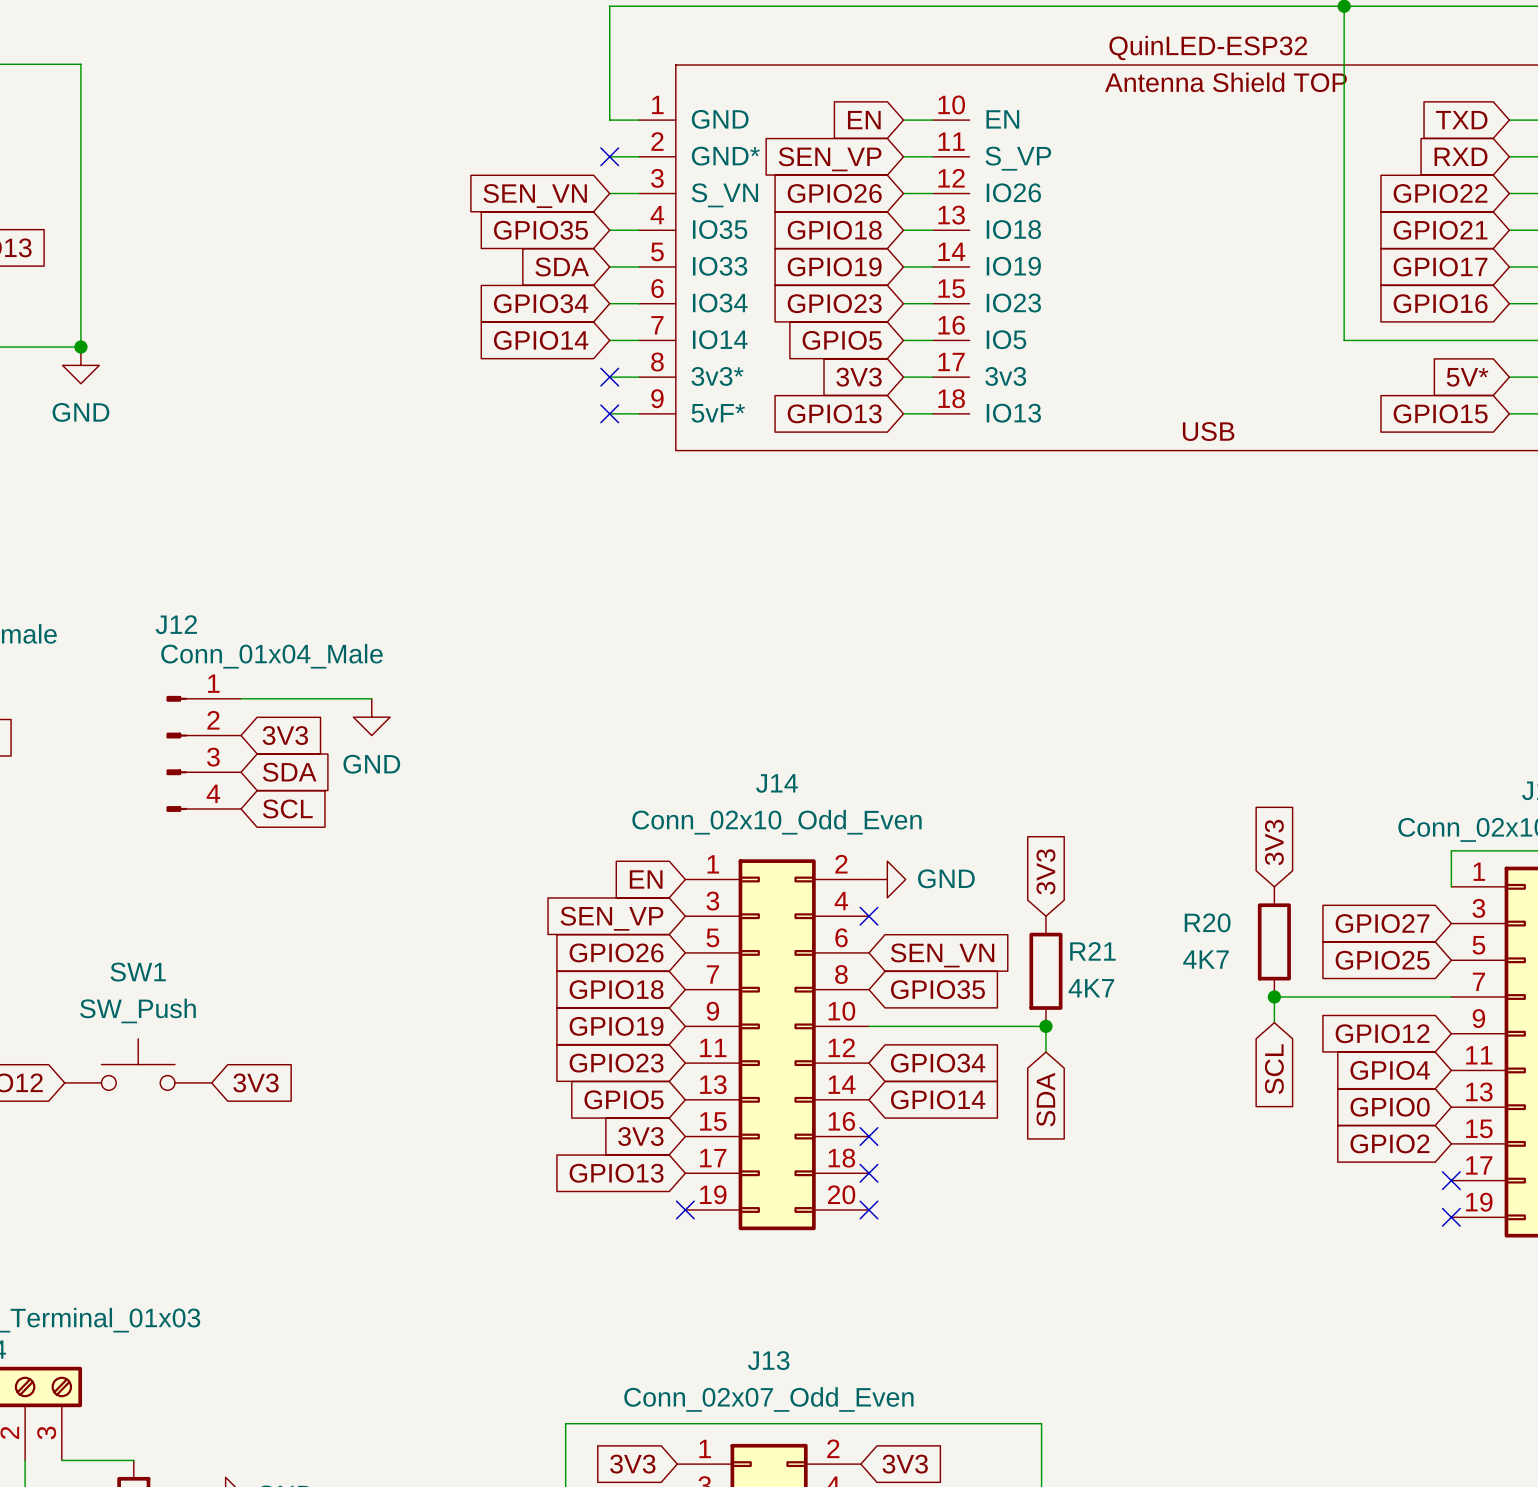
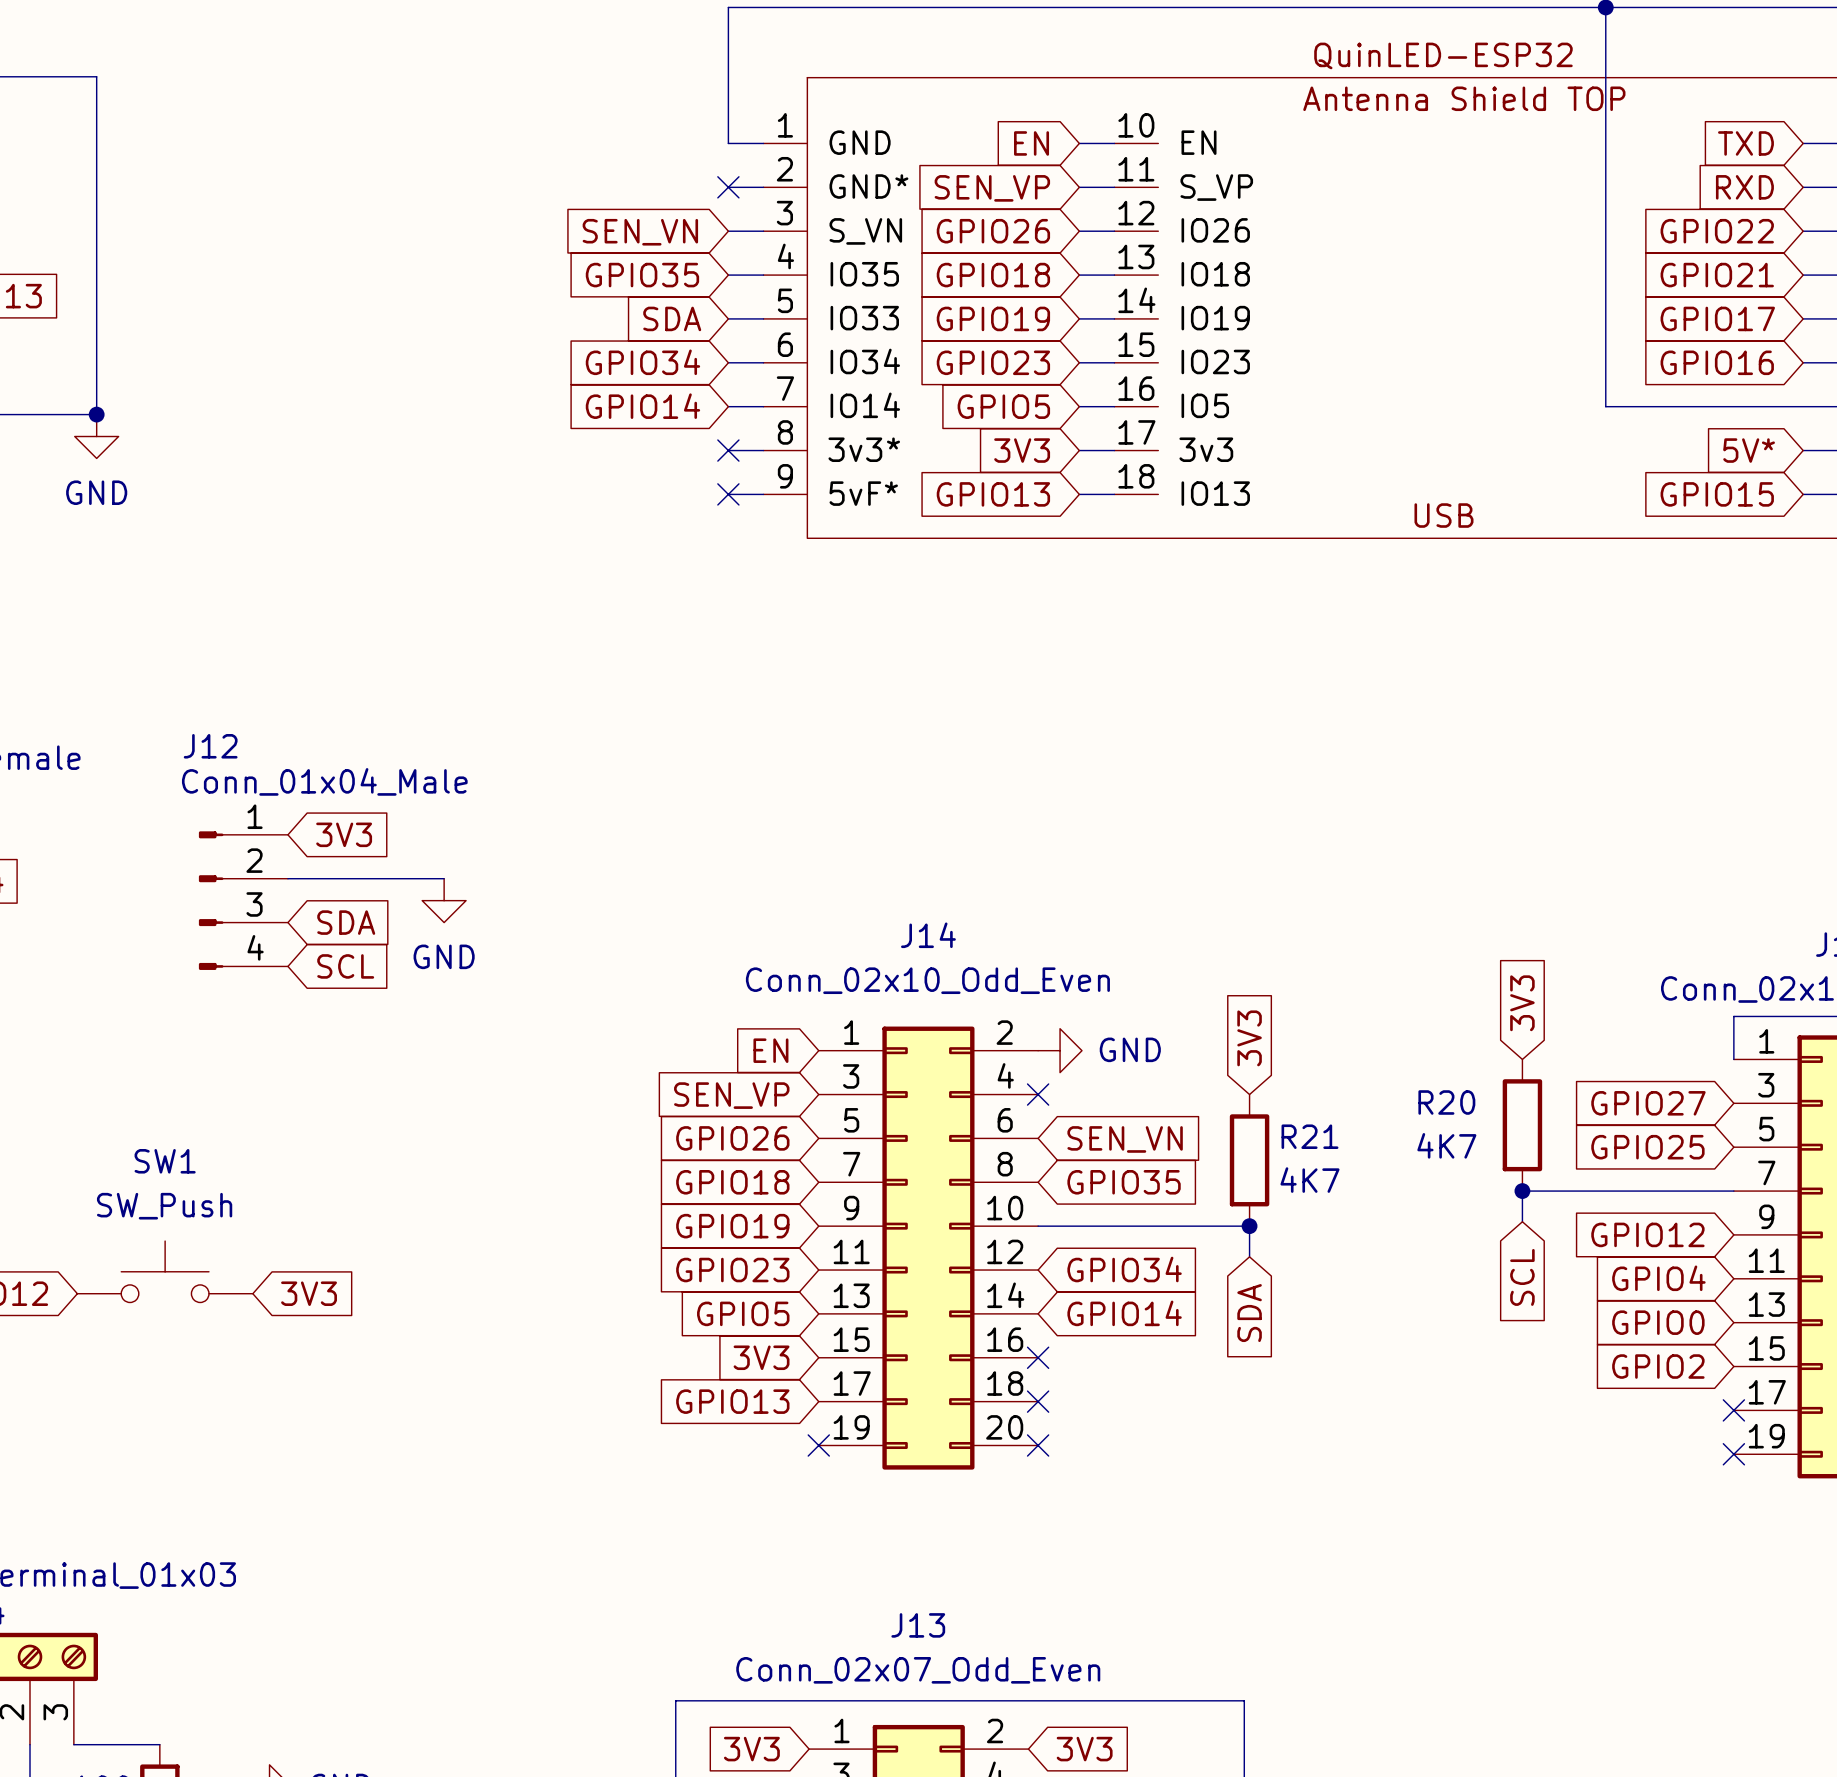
wire: (241, 698) (371, 698) -> (287, 878) (444, 878)
power symbol position: GND (371, 717) -> GND (444, 900)
global label position: 3V3 (285, 735) -> 3V3 (344, 834)

